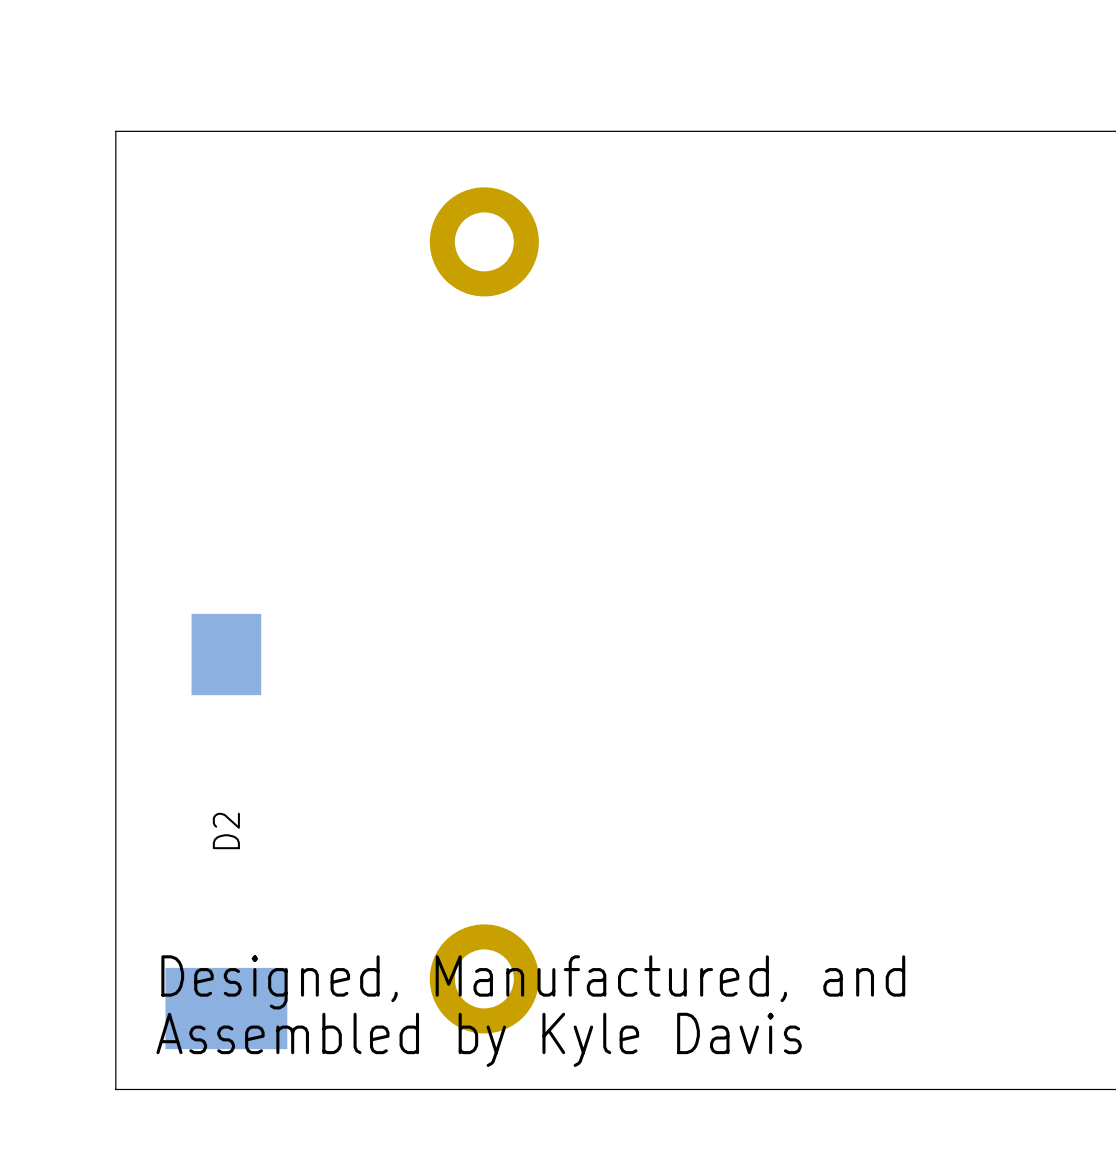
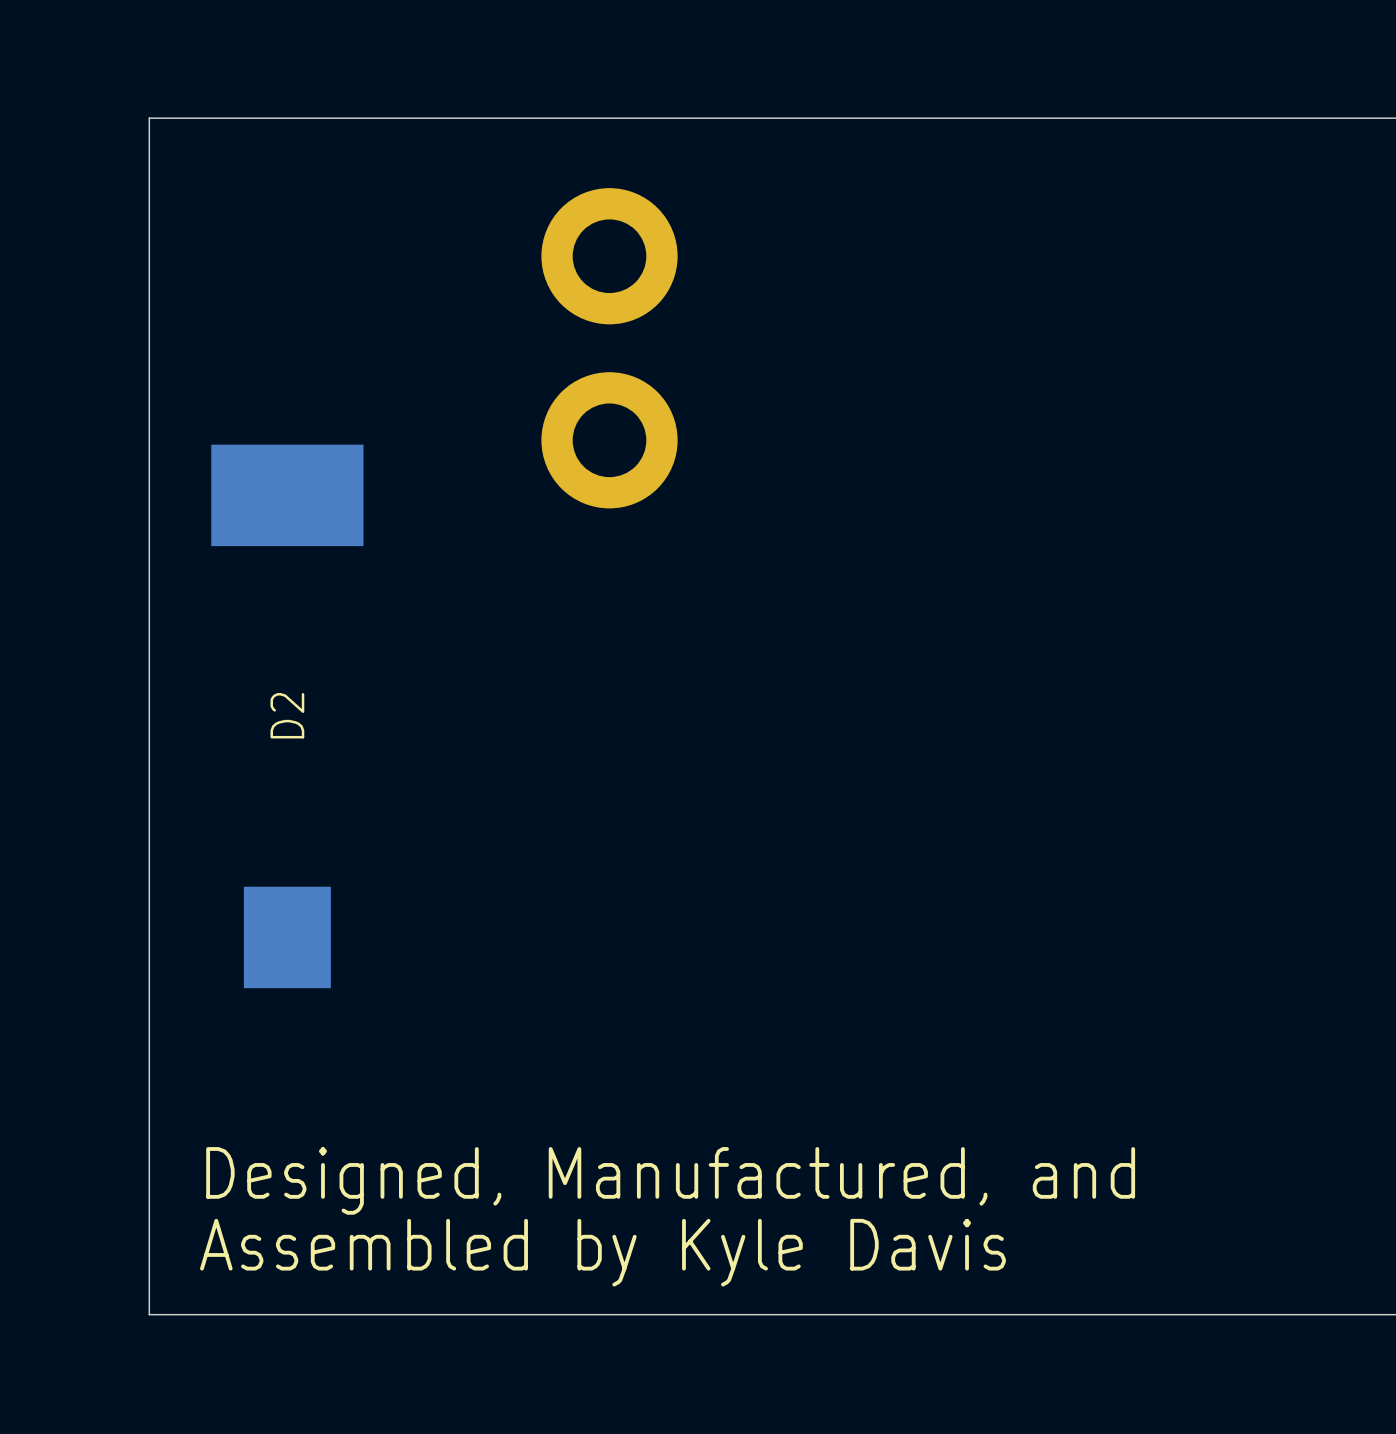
part: none -> (609, 440)
D2 rotation: 0° (226, 831) -> 180° (287, 716)
part: (484, 978) -> none

